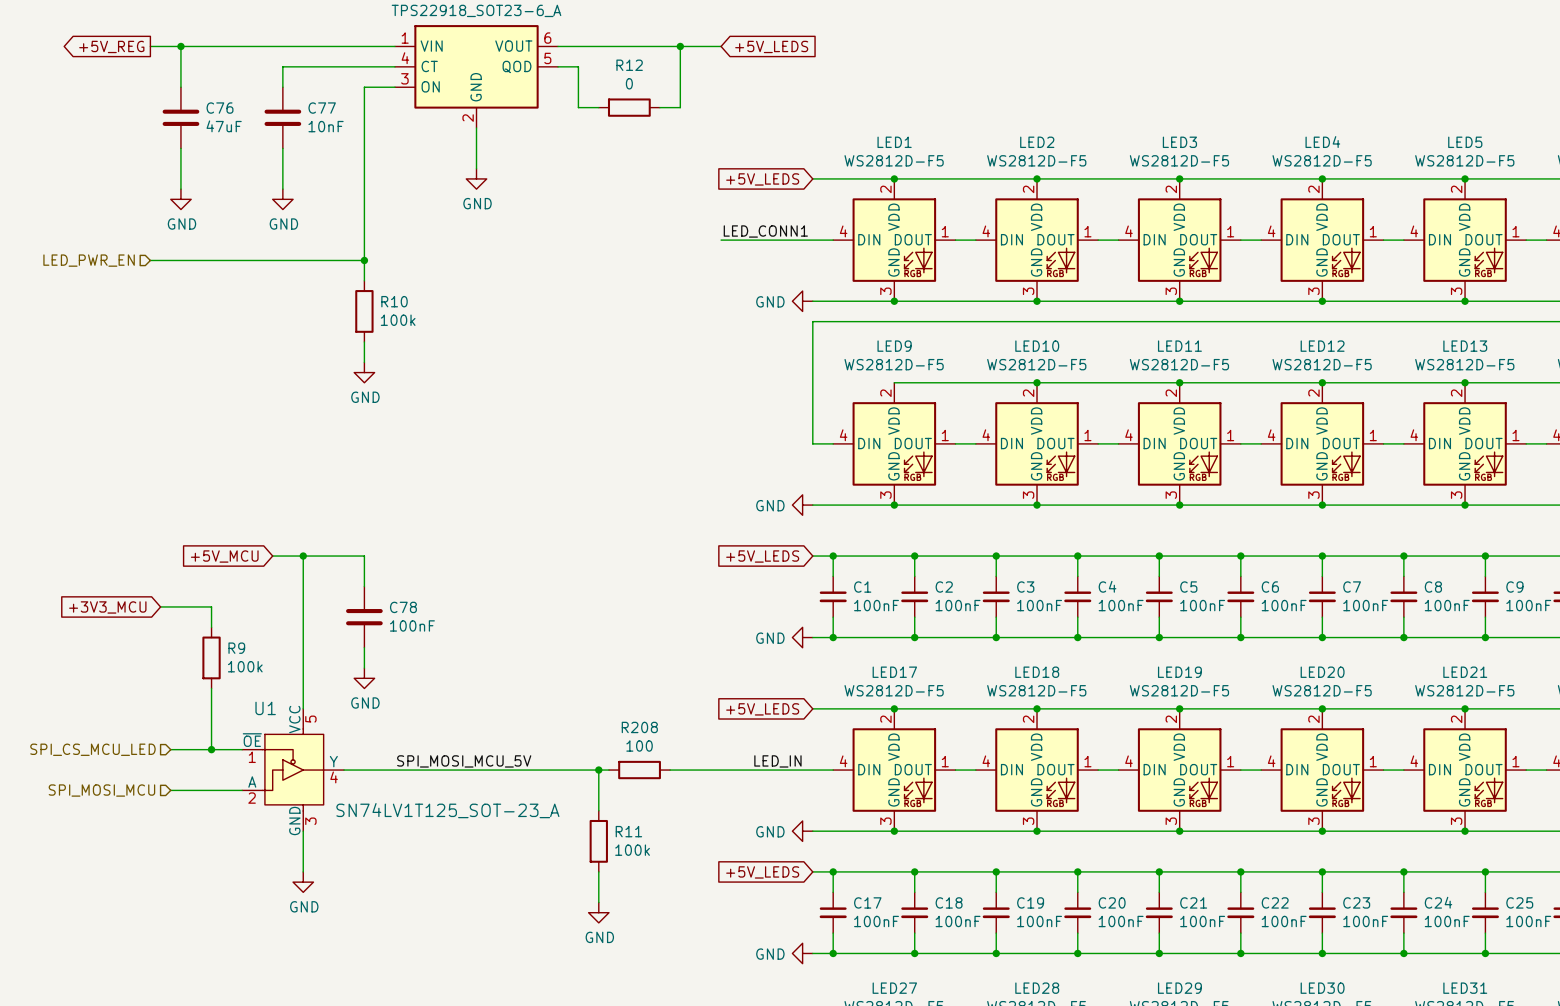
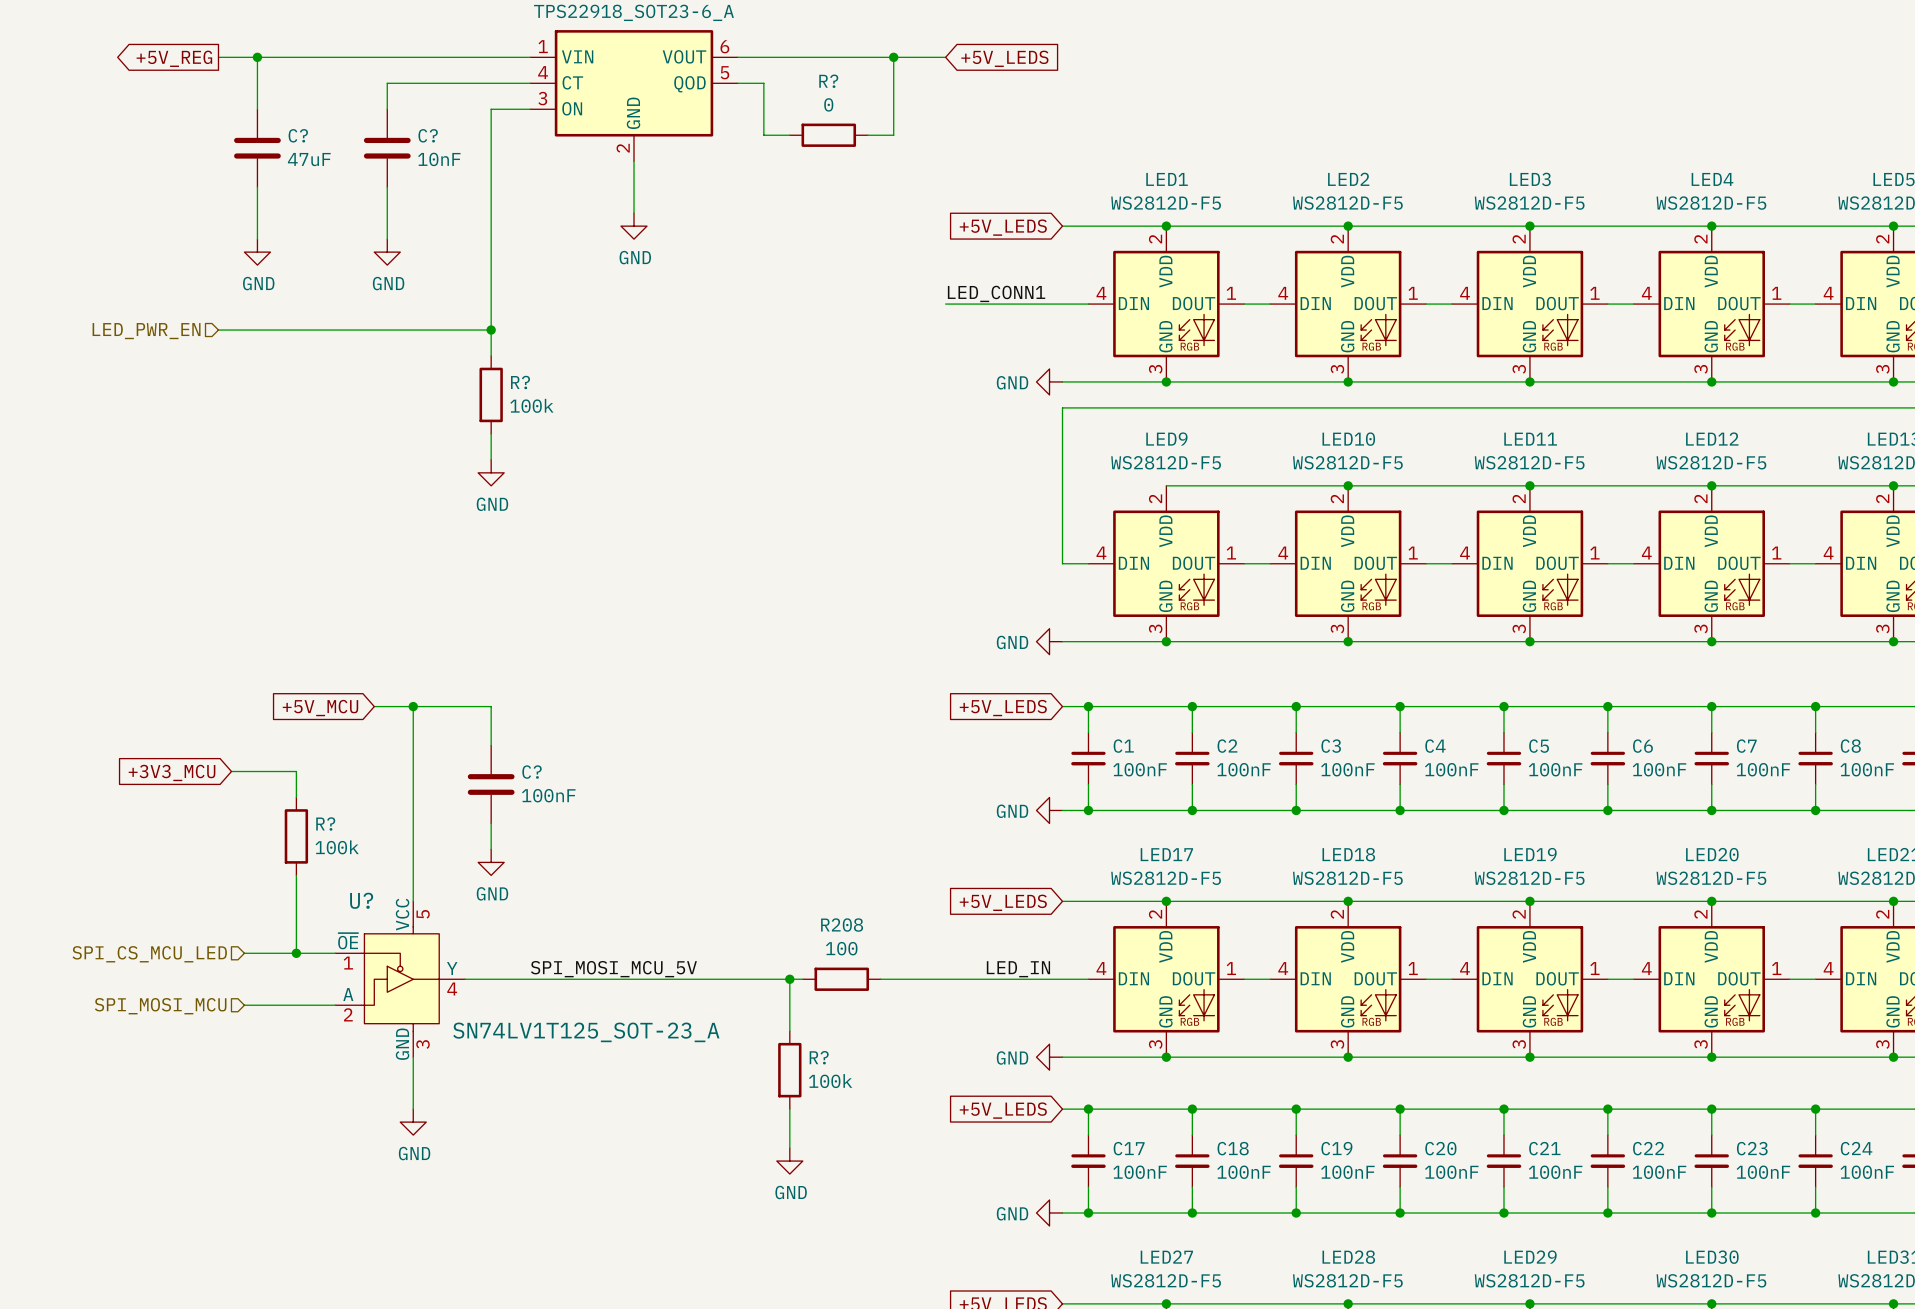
R12 name: R12 (629, 65) -> R? (828, 81)
C76 name: C76 (220, 108) -> C? (298, 135)
C77 name: C77 (322, 108) -> C? (428, 135)
R10 name: R10 (394, 301) -> R? (520, 382)
C78 name: C78 (403, 607) -> C? (532, 772)
R9 name: R9 (236, 648) -> R? (325, 823)
U1 name: U1 (265, 708) -> U? (361, 900)
R11 name: R11 (628, 831) -> R? (819, 1057)

